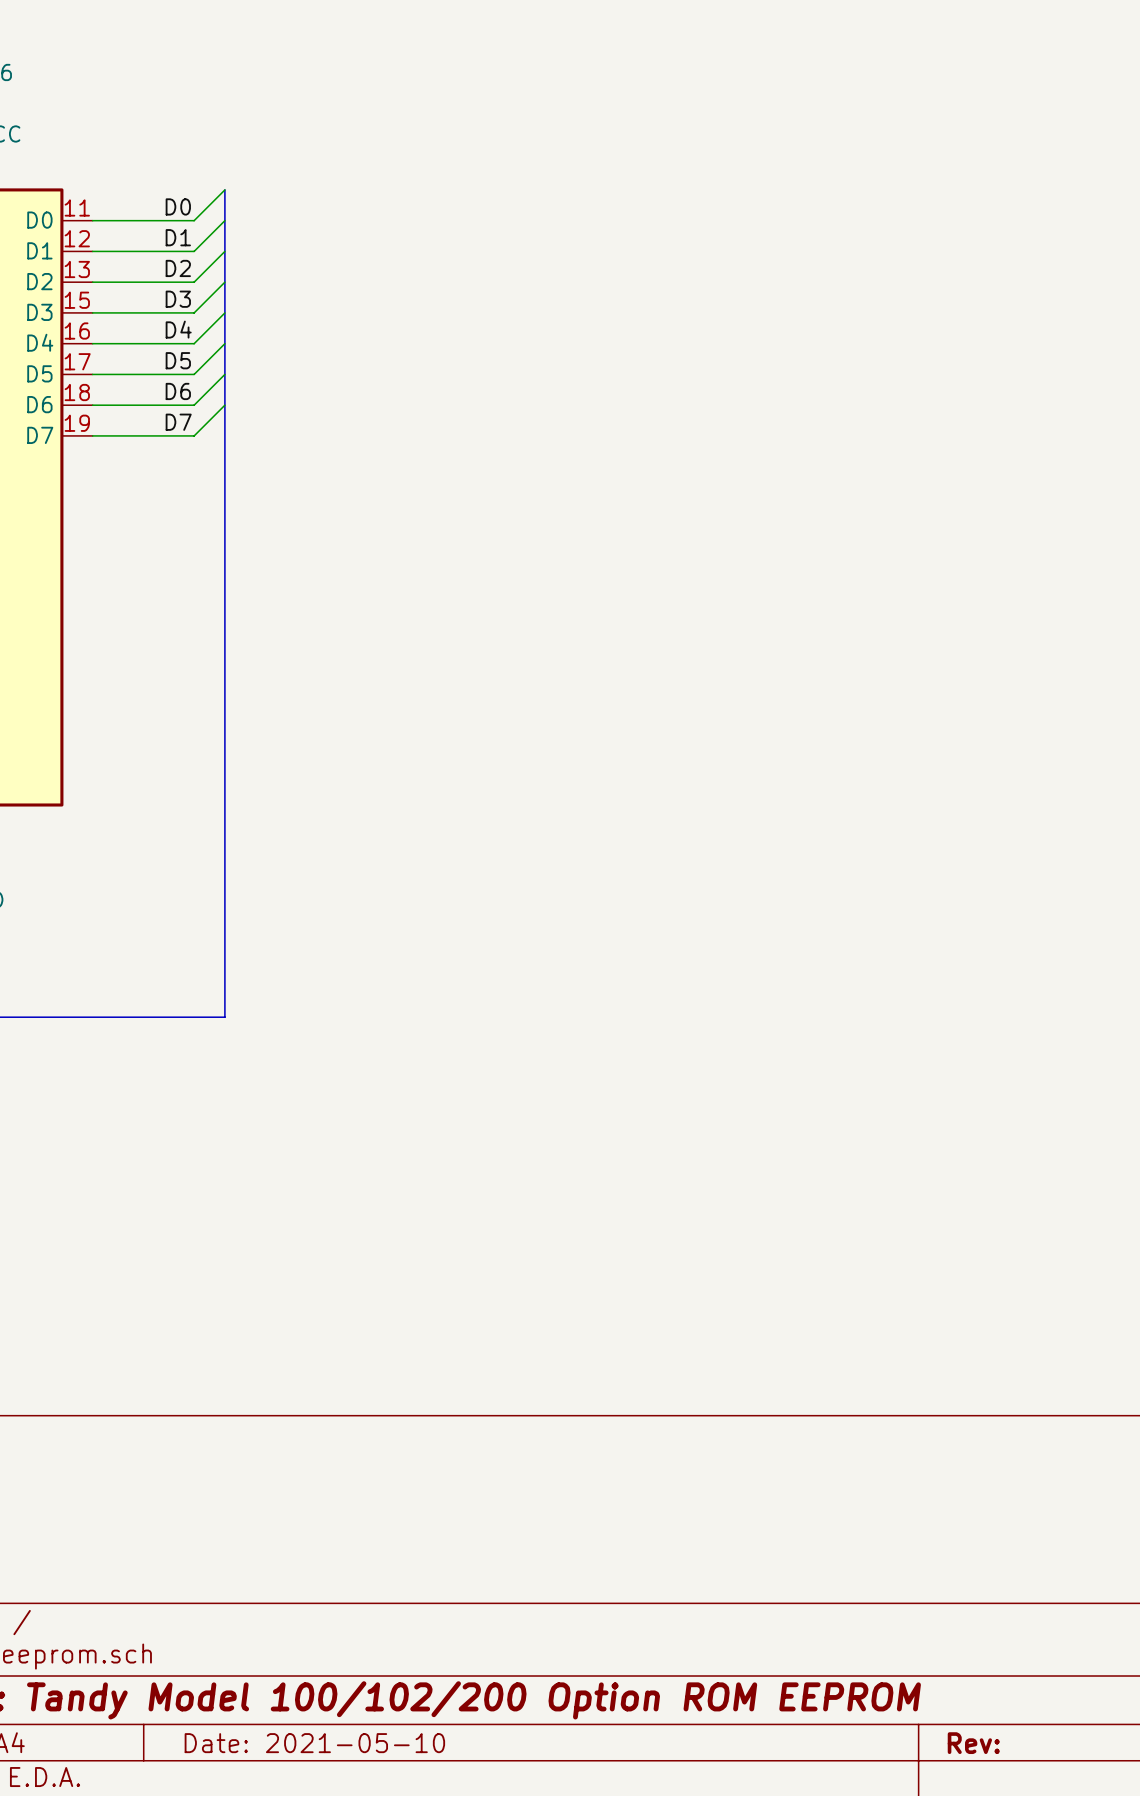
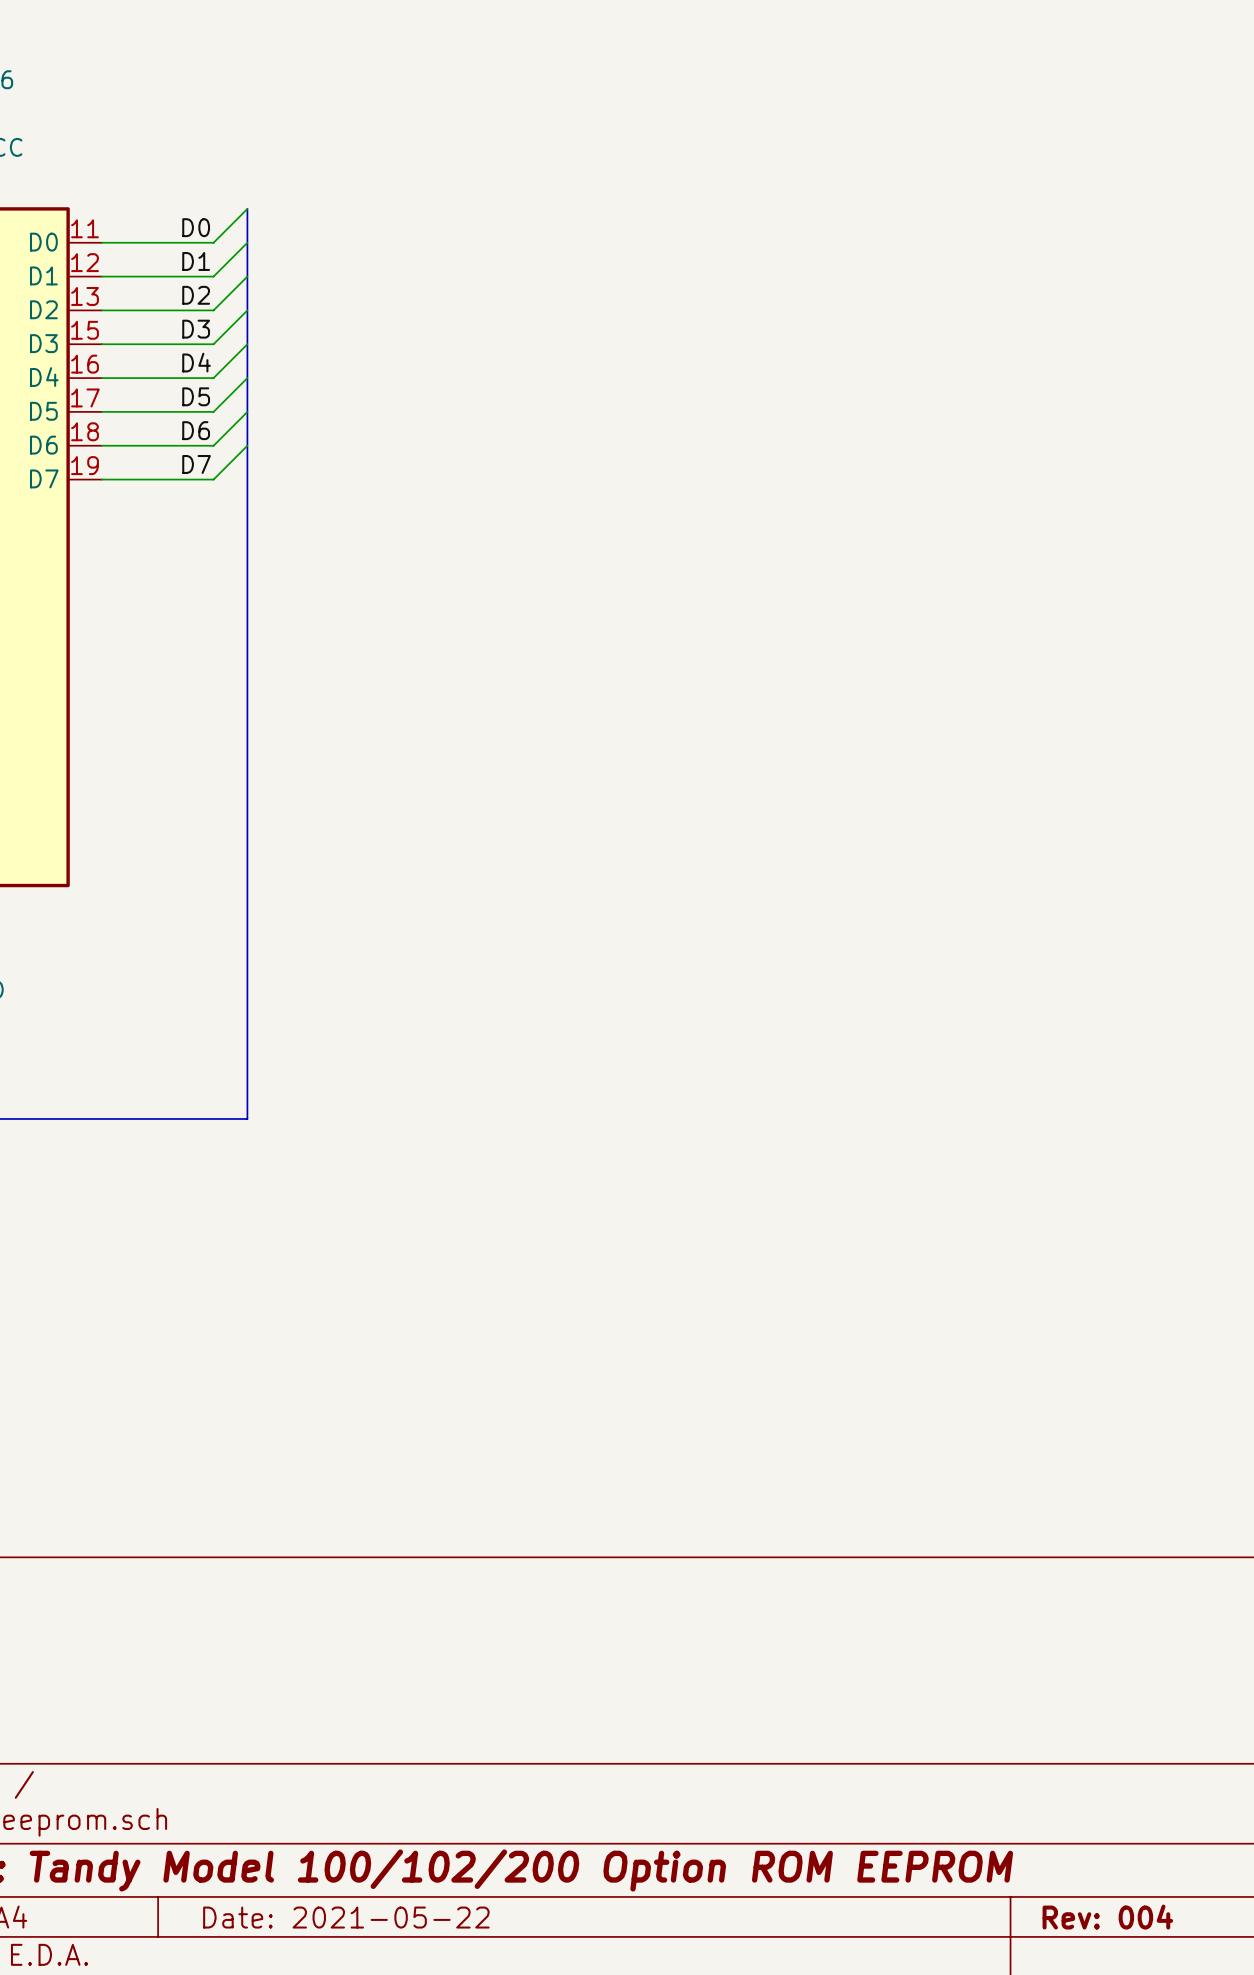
title block: Date: 2021-05-10 (314, 1743) -> Date: 2021-05-22 (346, 1917)
title block: Rev: (973, 1743) -> Rev: 004 (1107, 1917)

